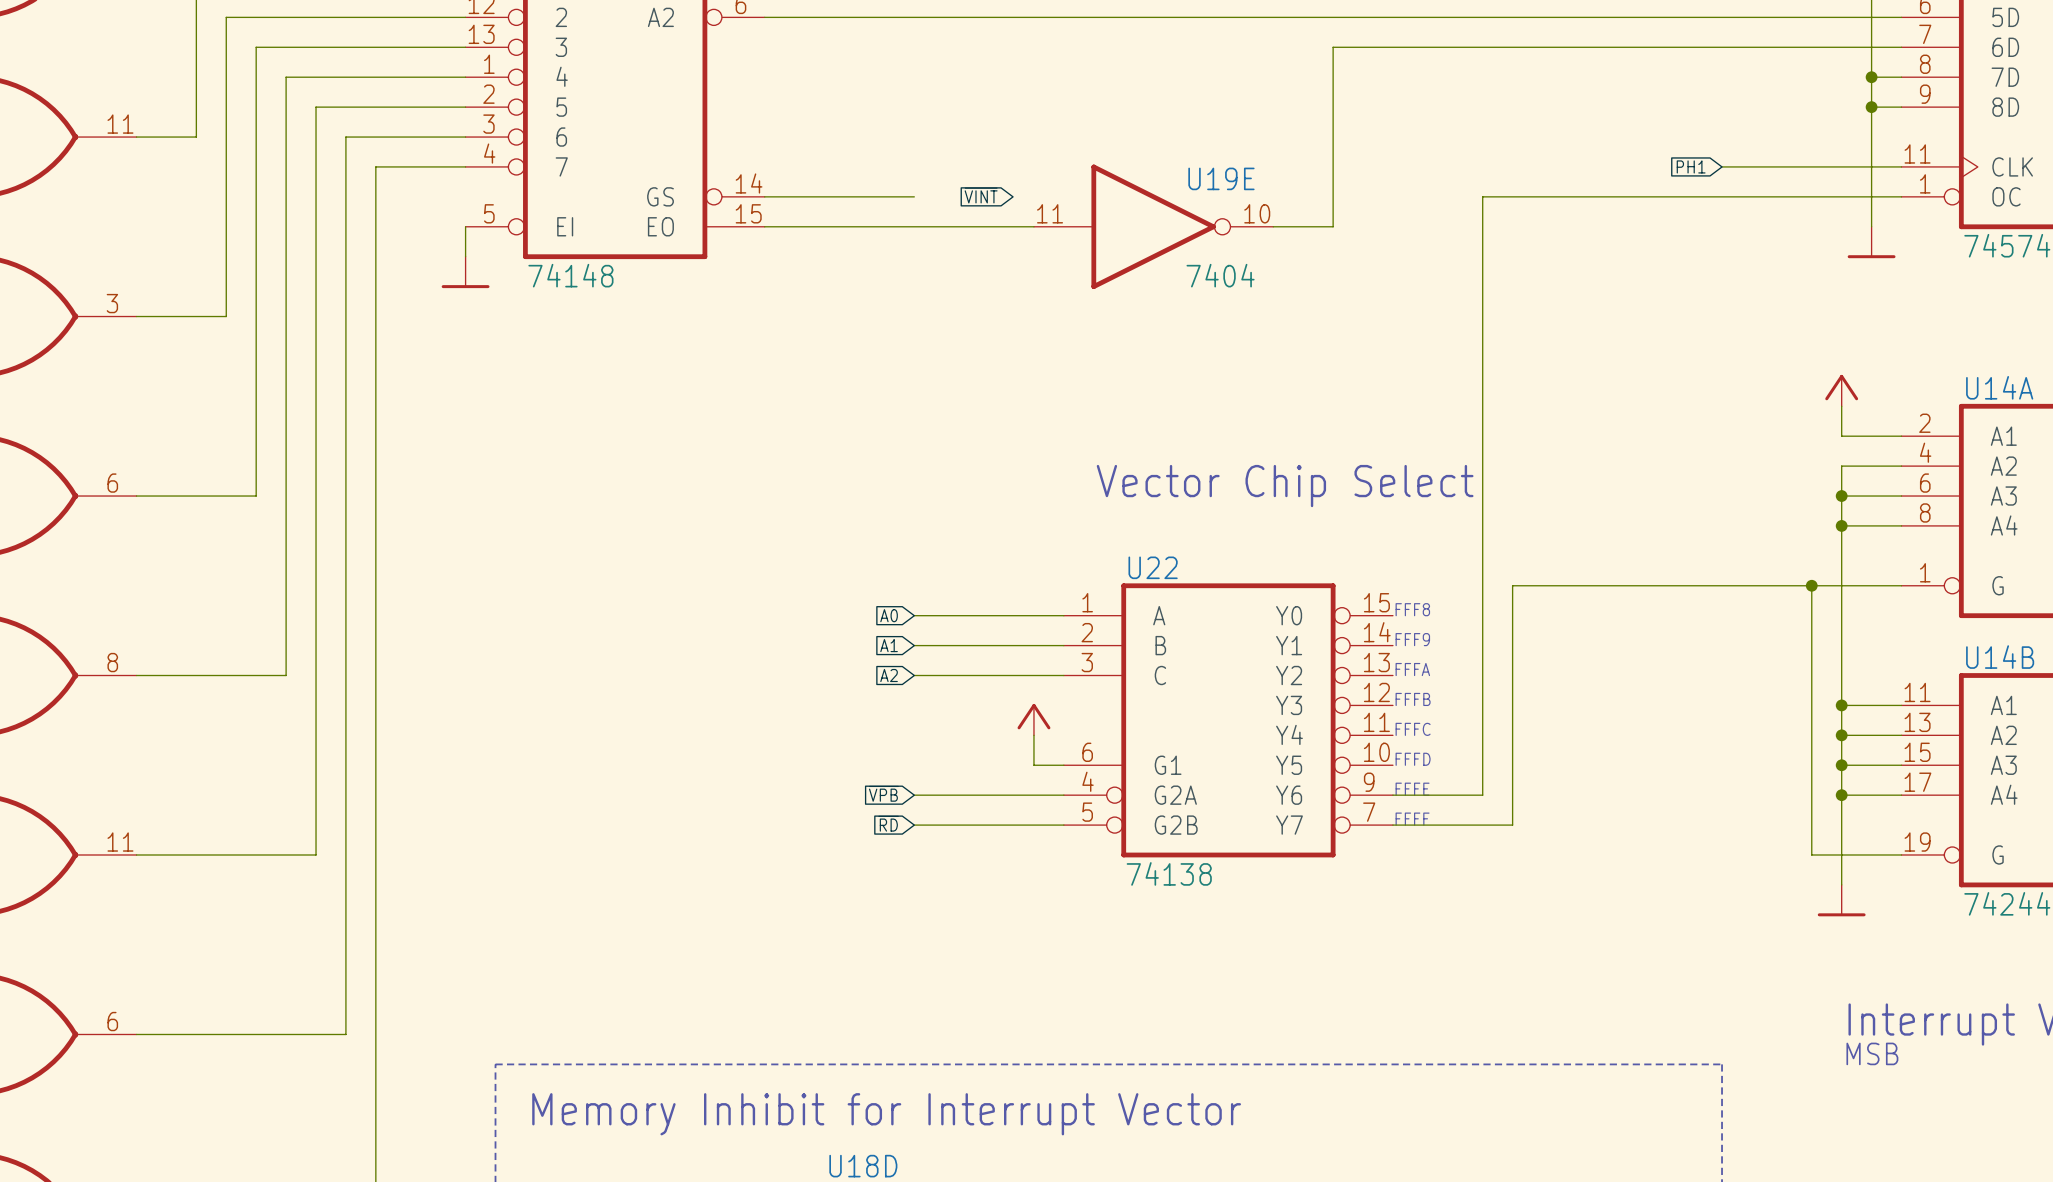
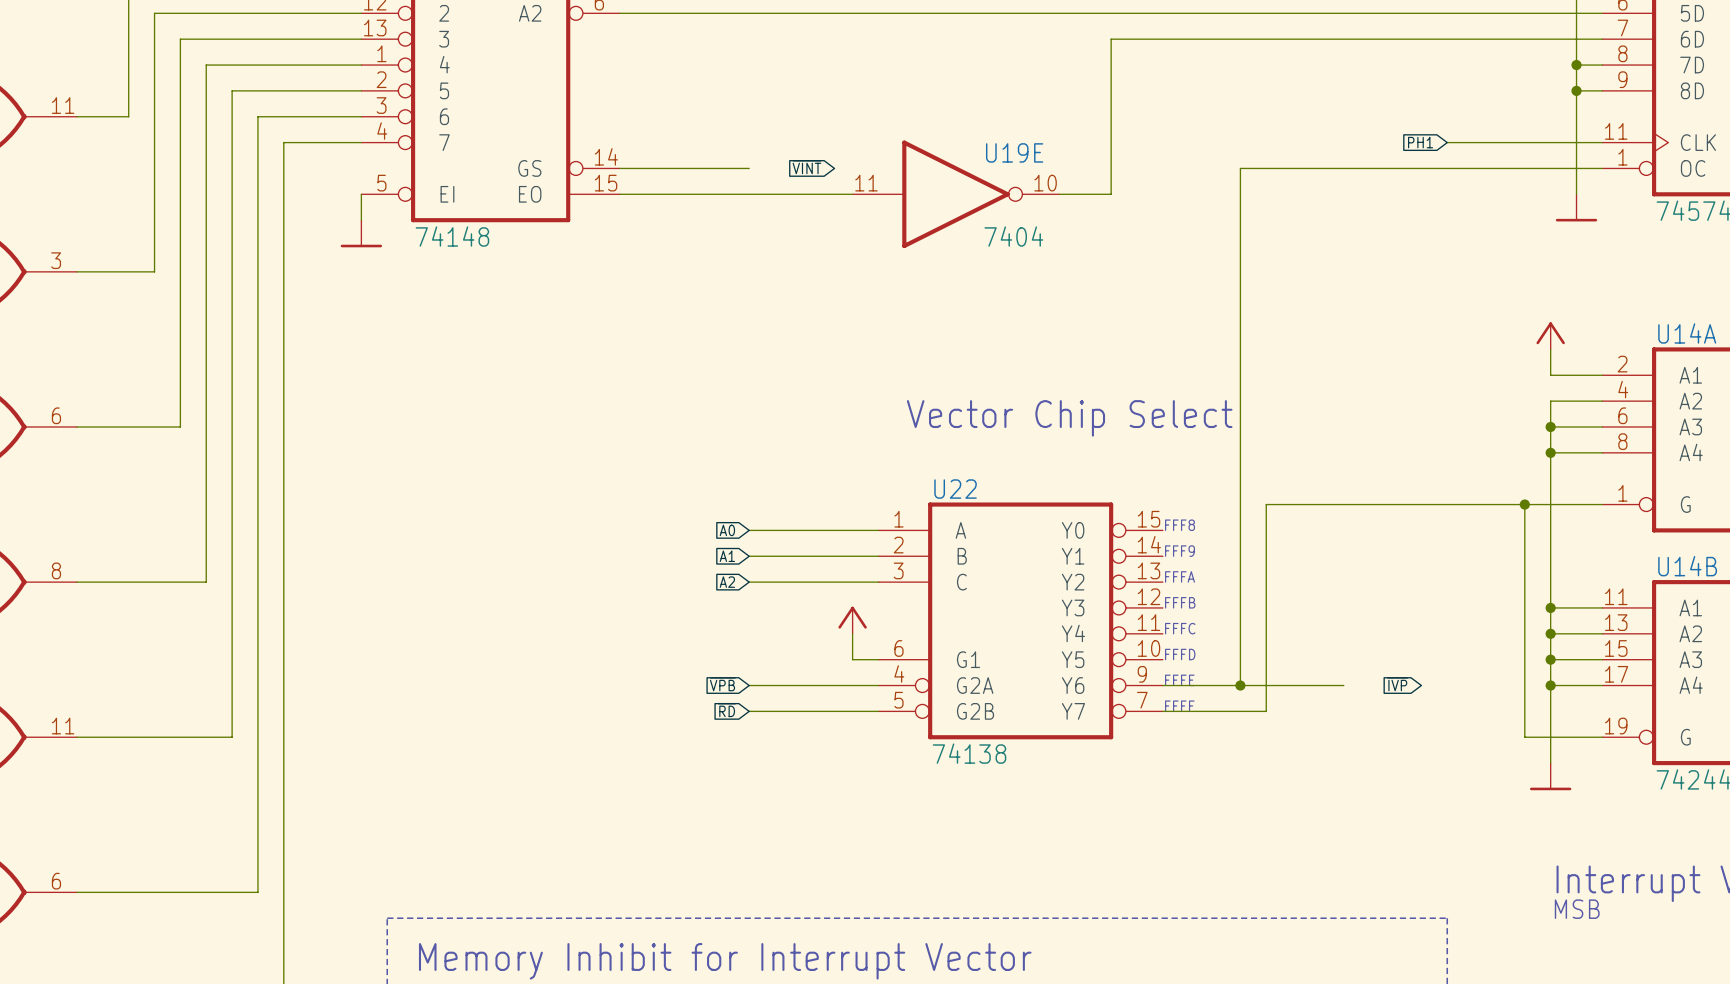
global label: none -> ~{IVP} (1397, 684)
wire: none -> (1240, 685) (1343, 685)
junction: none -> (1240, 685)

